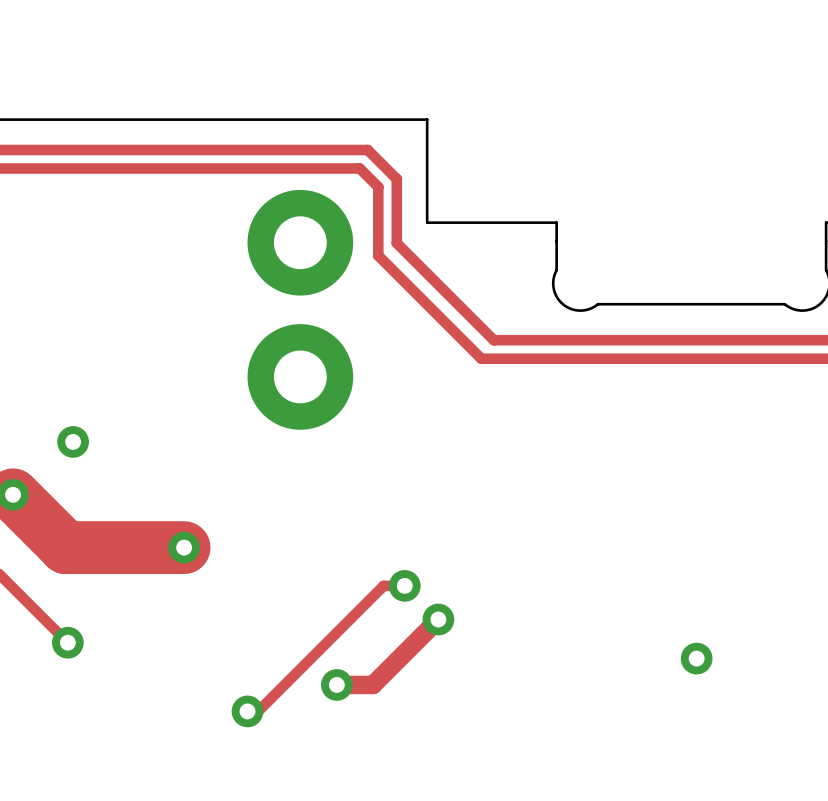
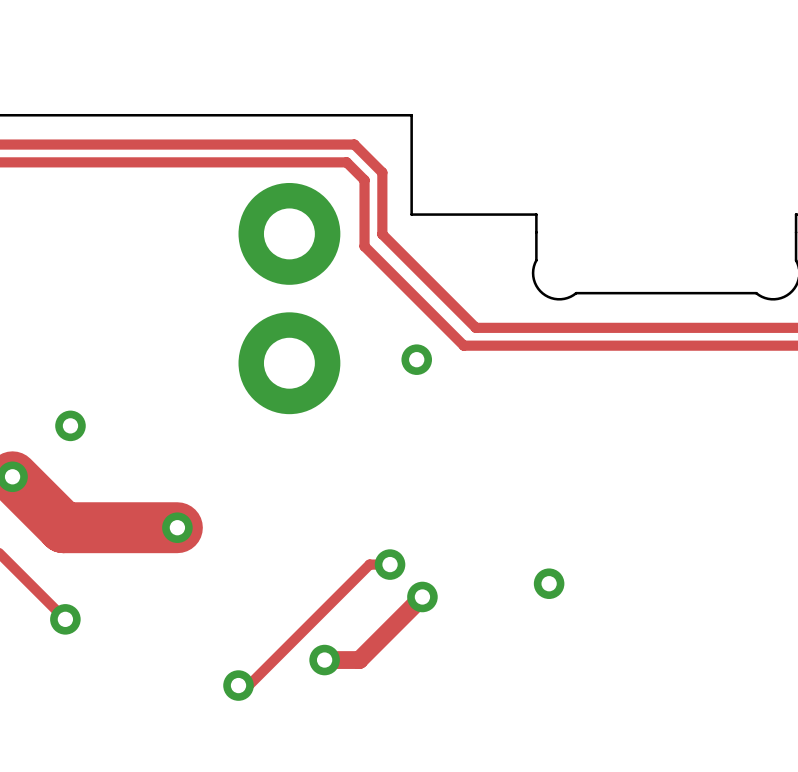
via: none -> (416, 359)
via position: (696, 658) -> (549, 583)

